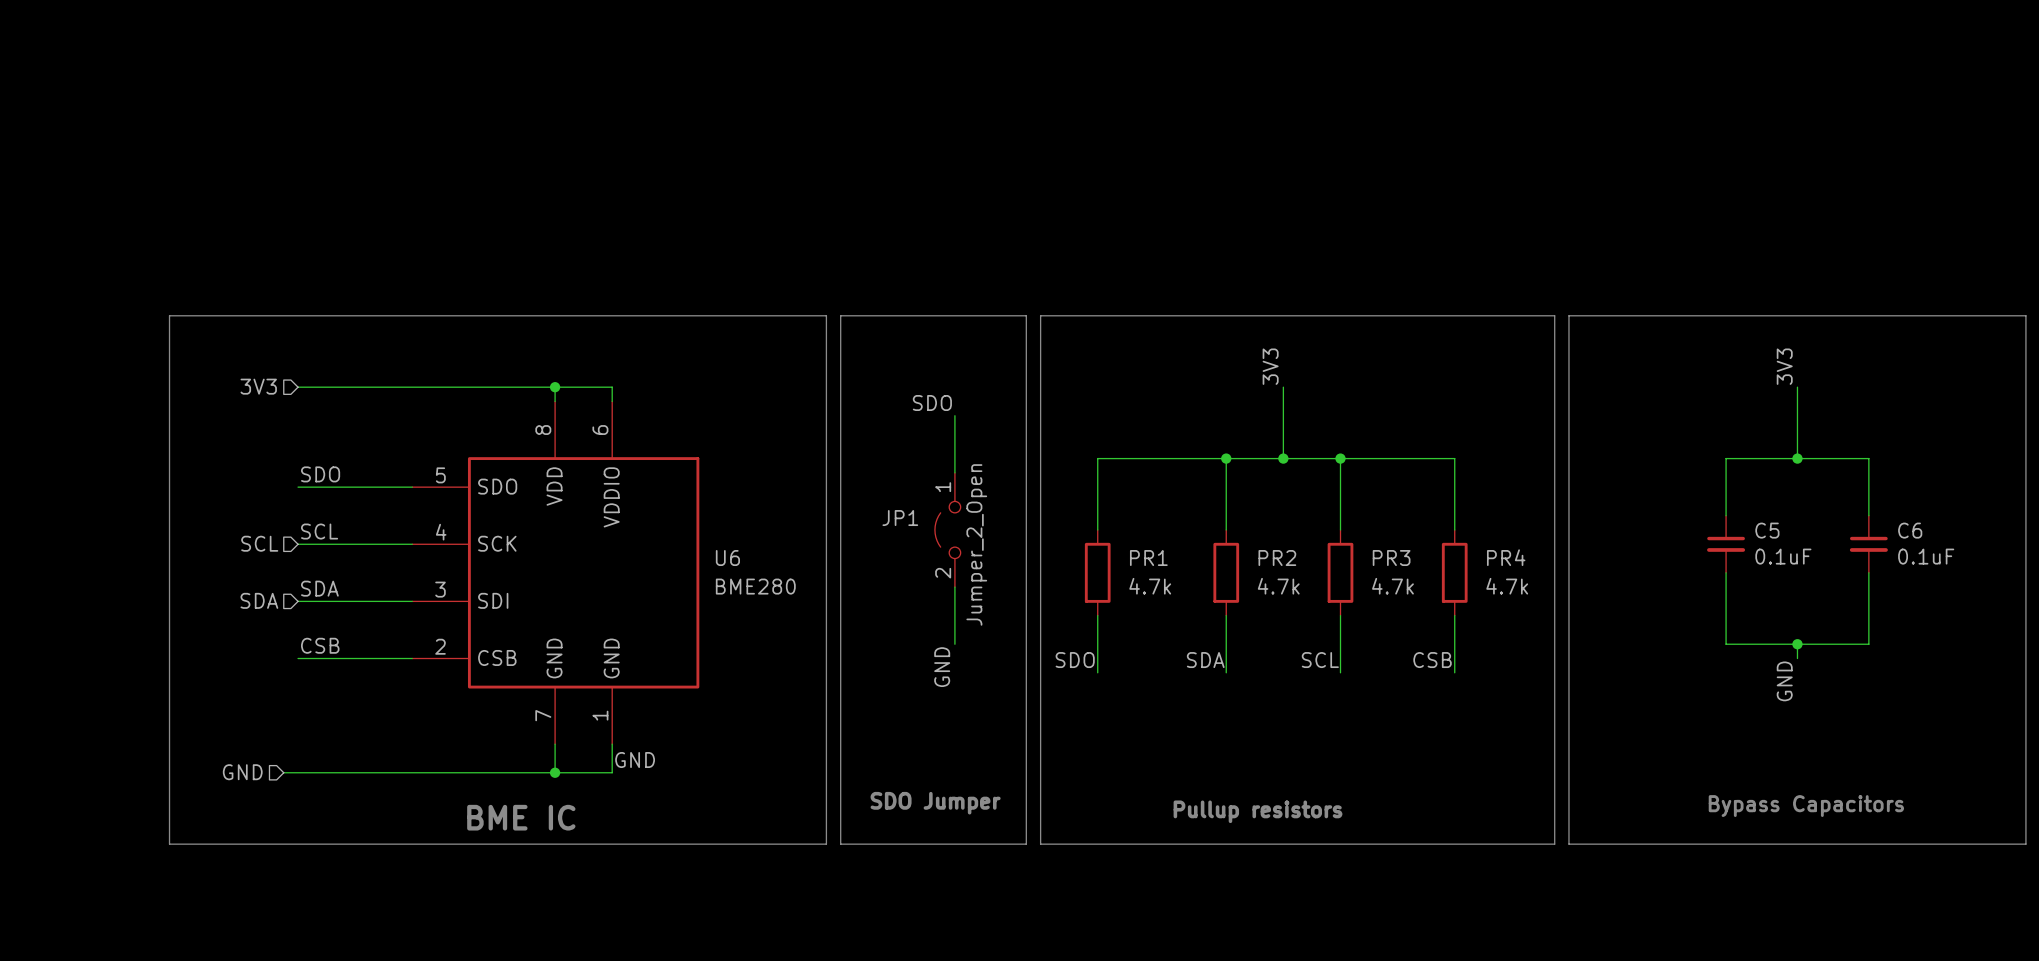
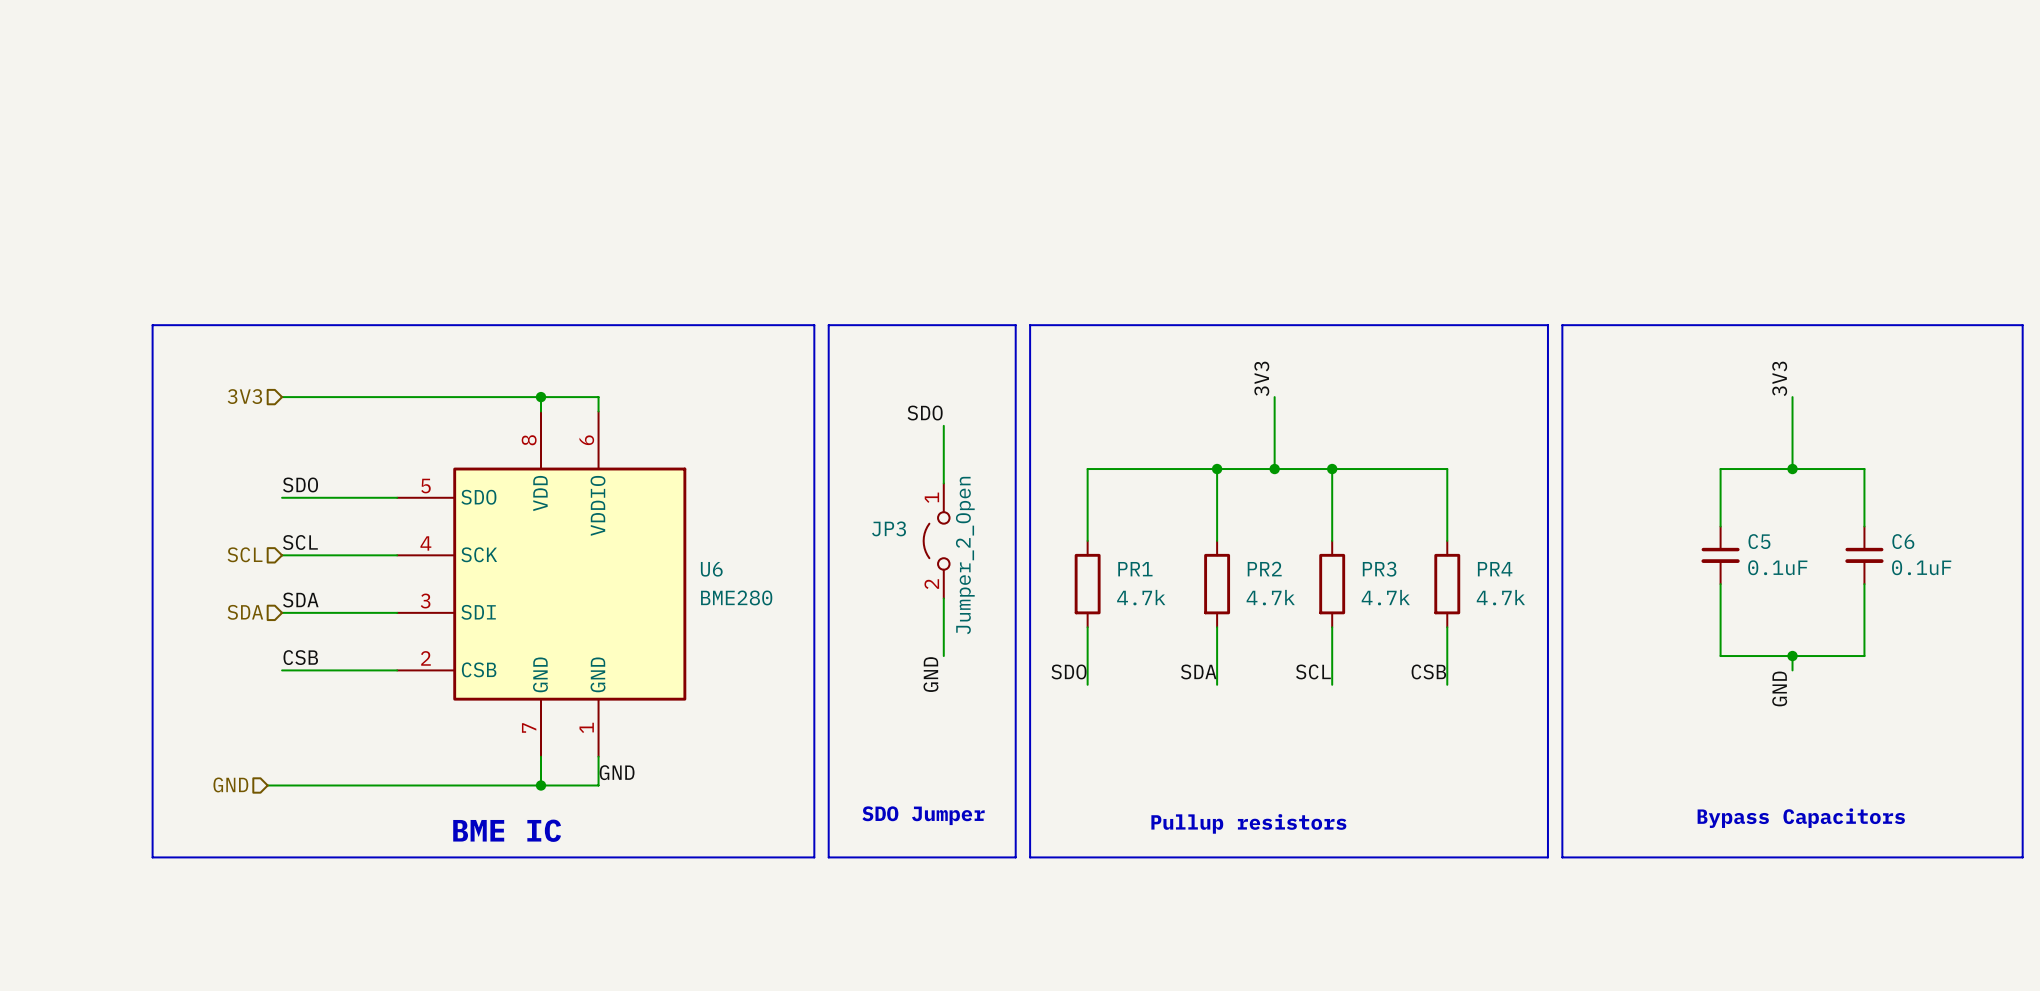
JP1 name: JP1 (900, 518) -> JP3 (889, 528)

